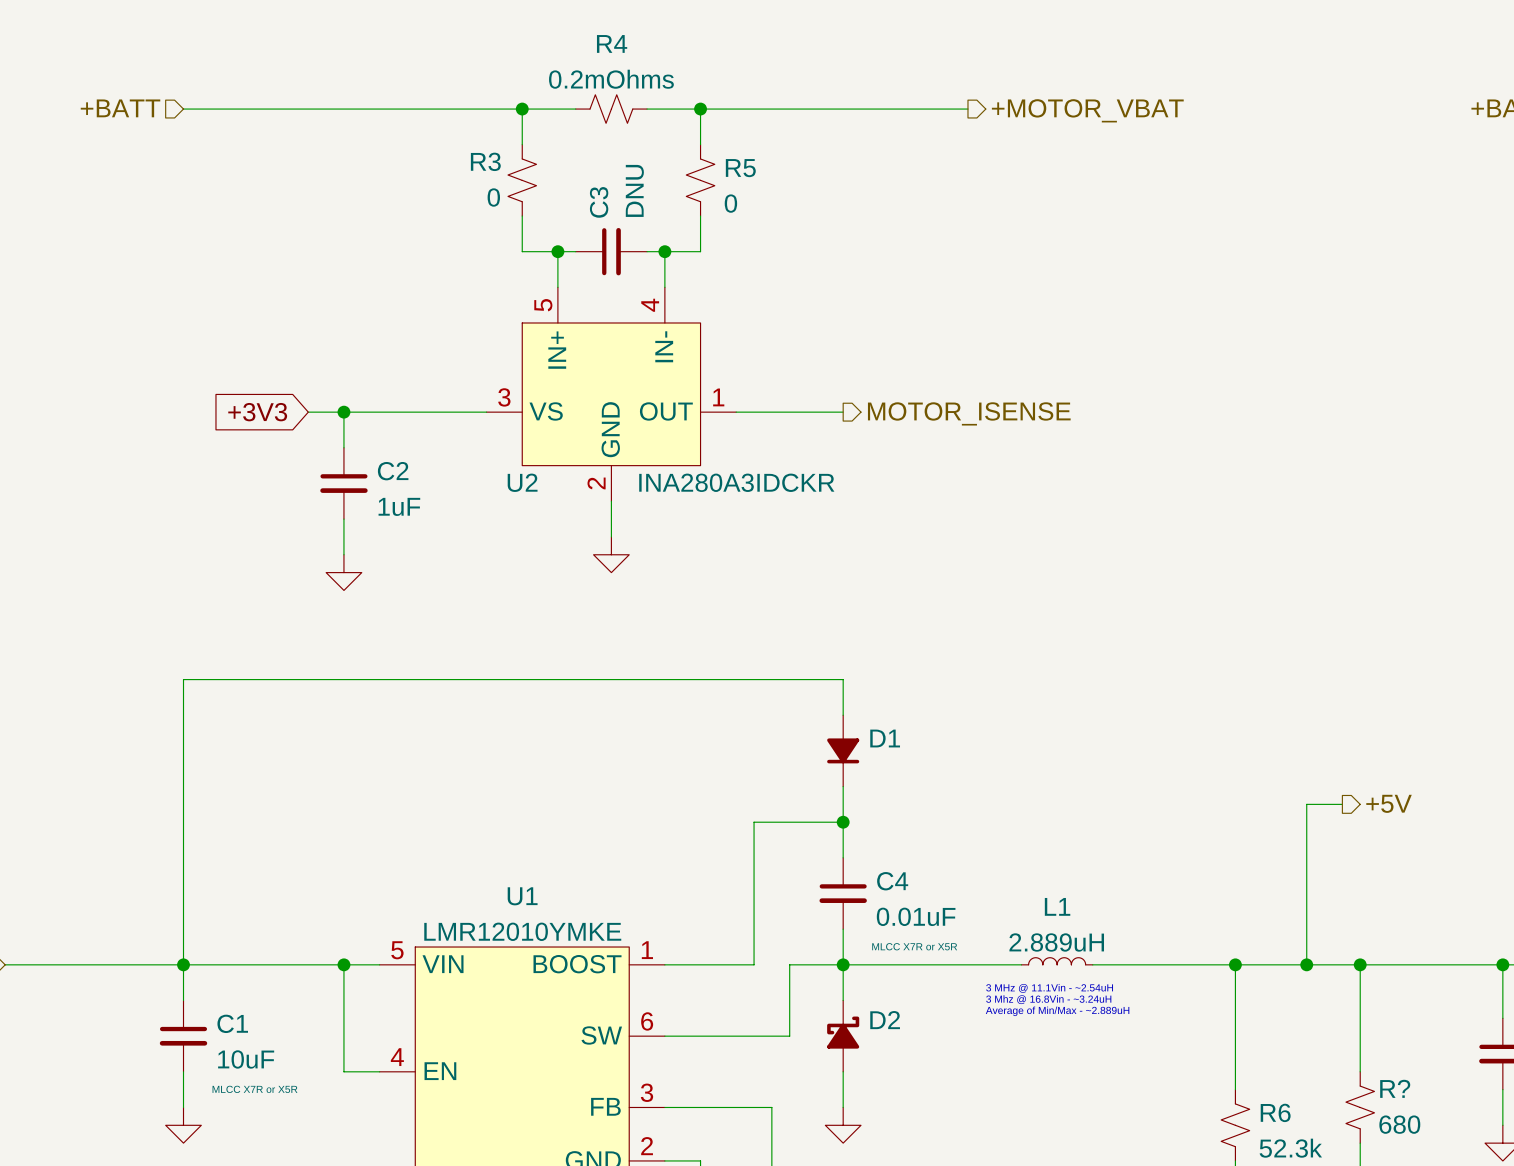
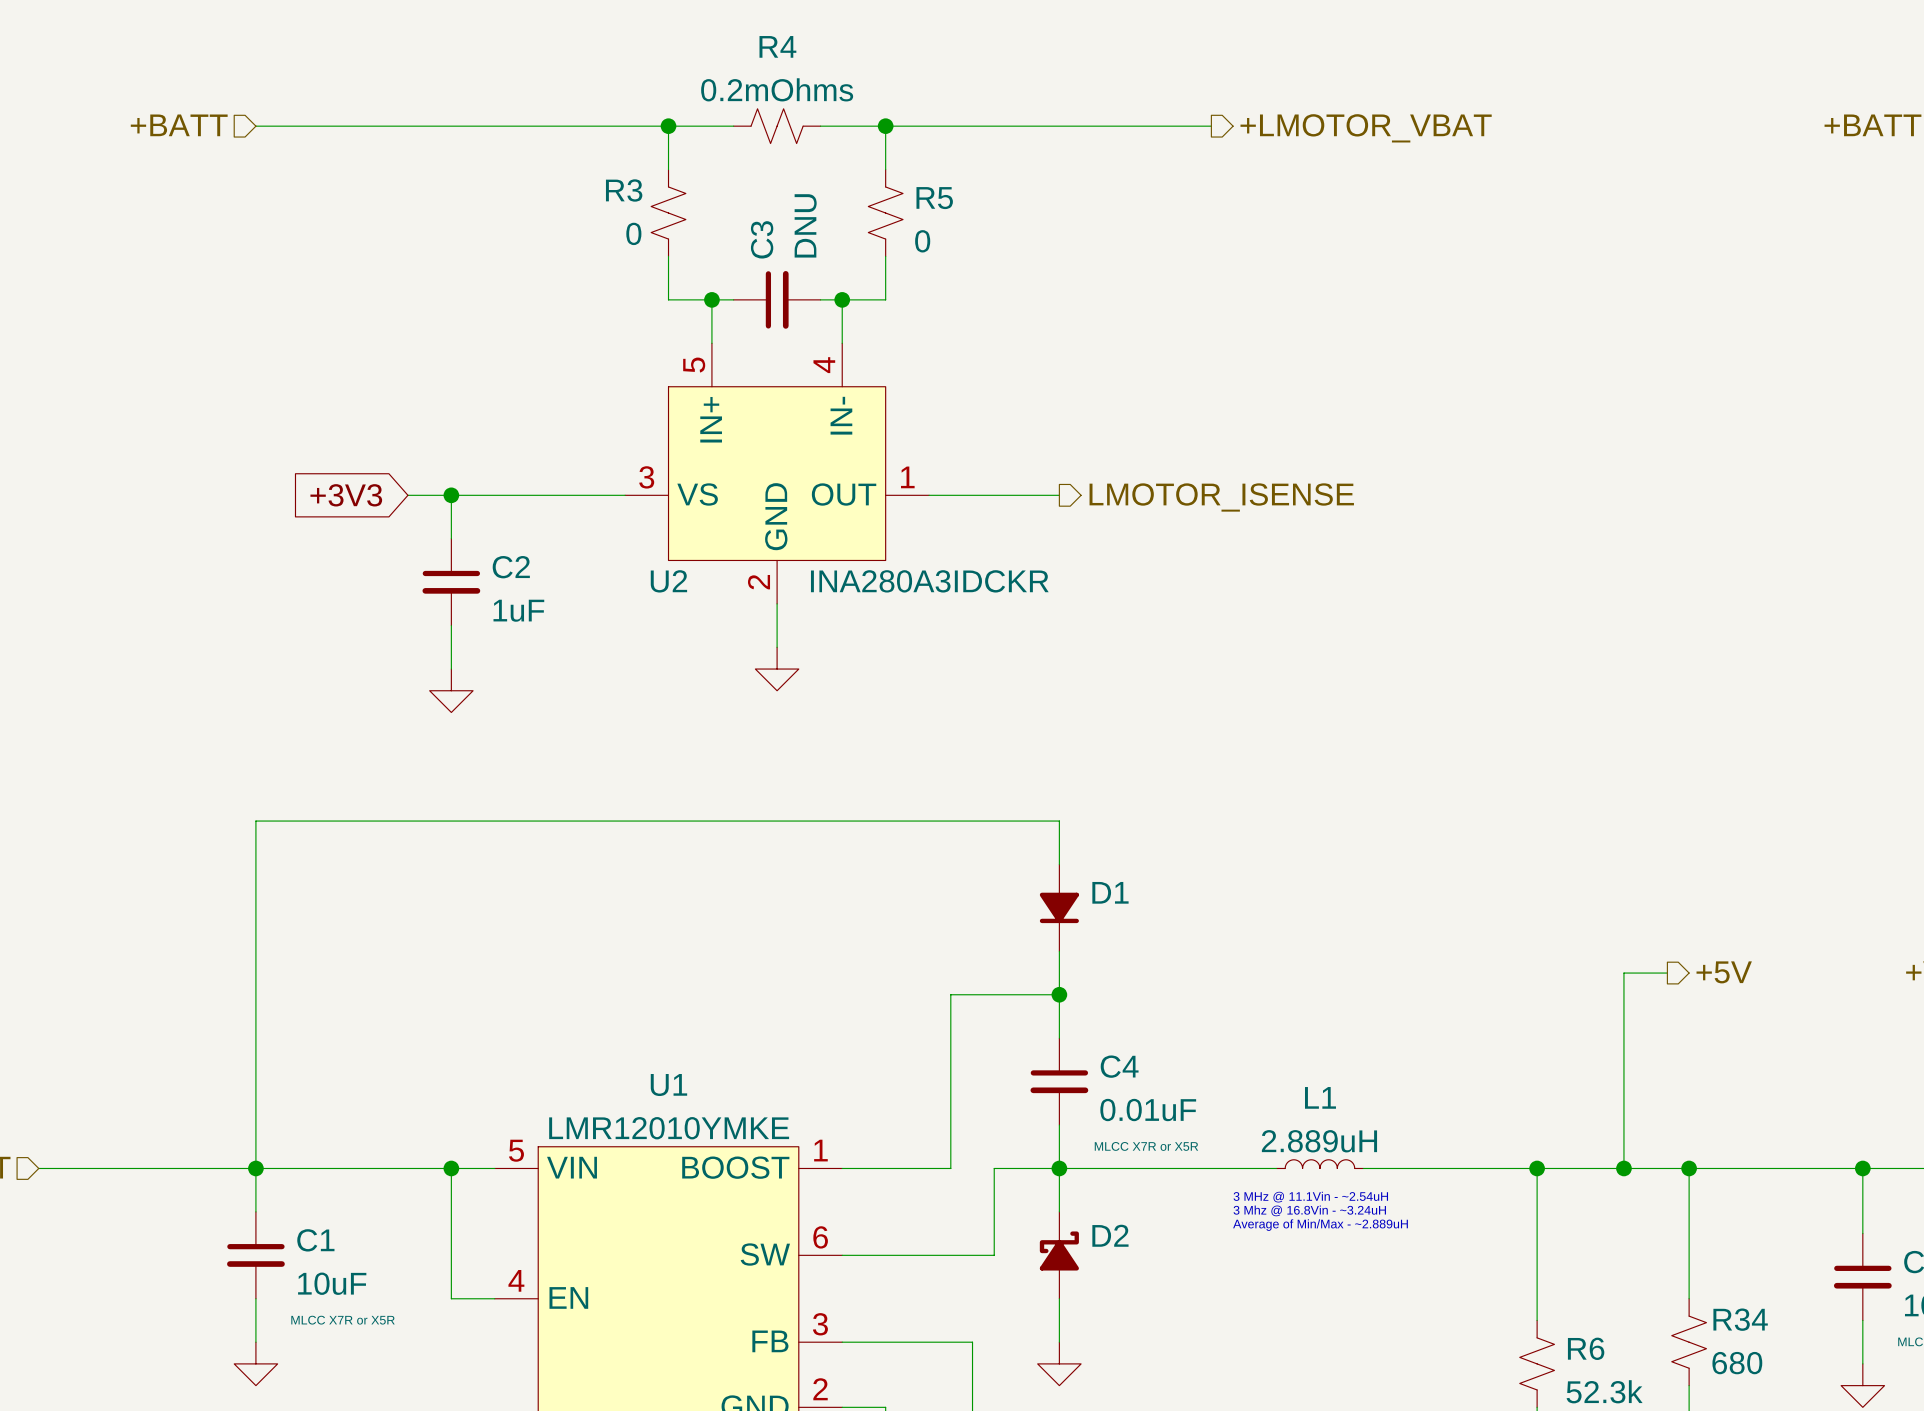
hierarchical label: +MOTOR_VBAT (1087, 110) -> +LMOTOR_VBAT (1366, 128)
hierarchical label: MOTOR_ISENSE (969, 413) -> LMOTOR_ISENSE (1221, 497)
R? name: R? (1395, 1088) -> R34 (1740, 1319)

